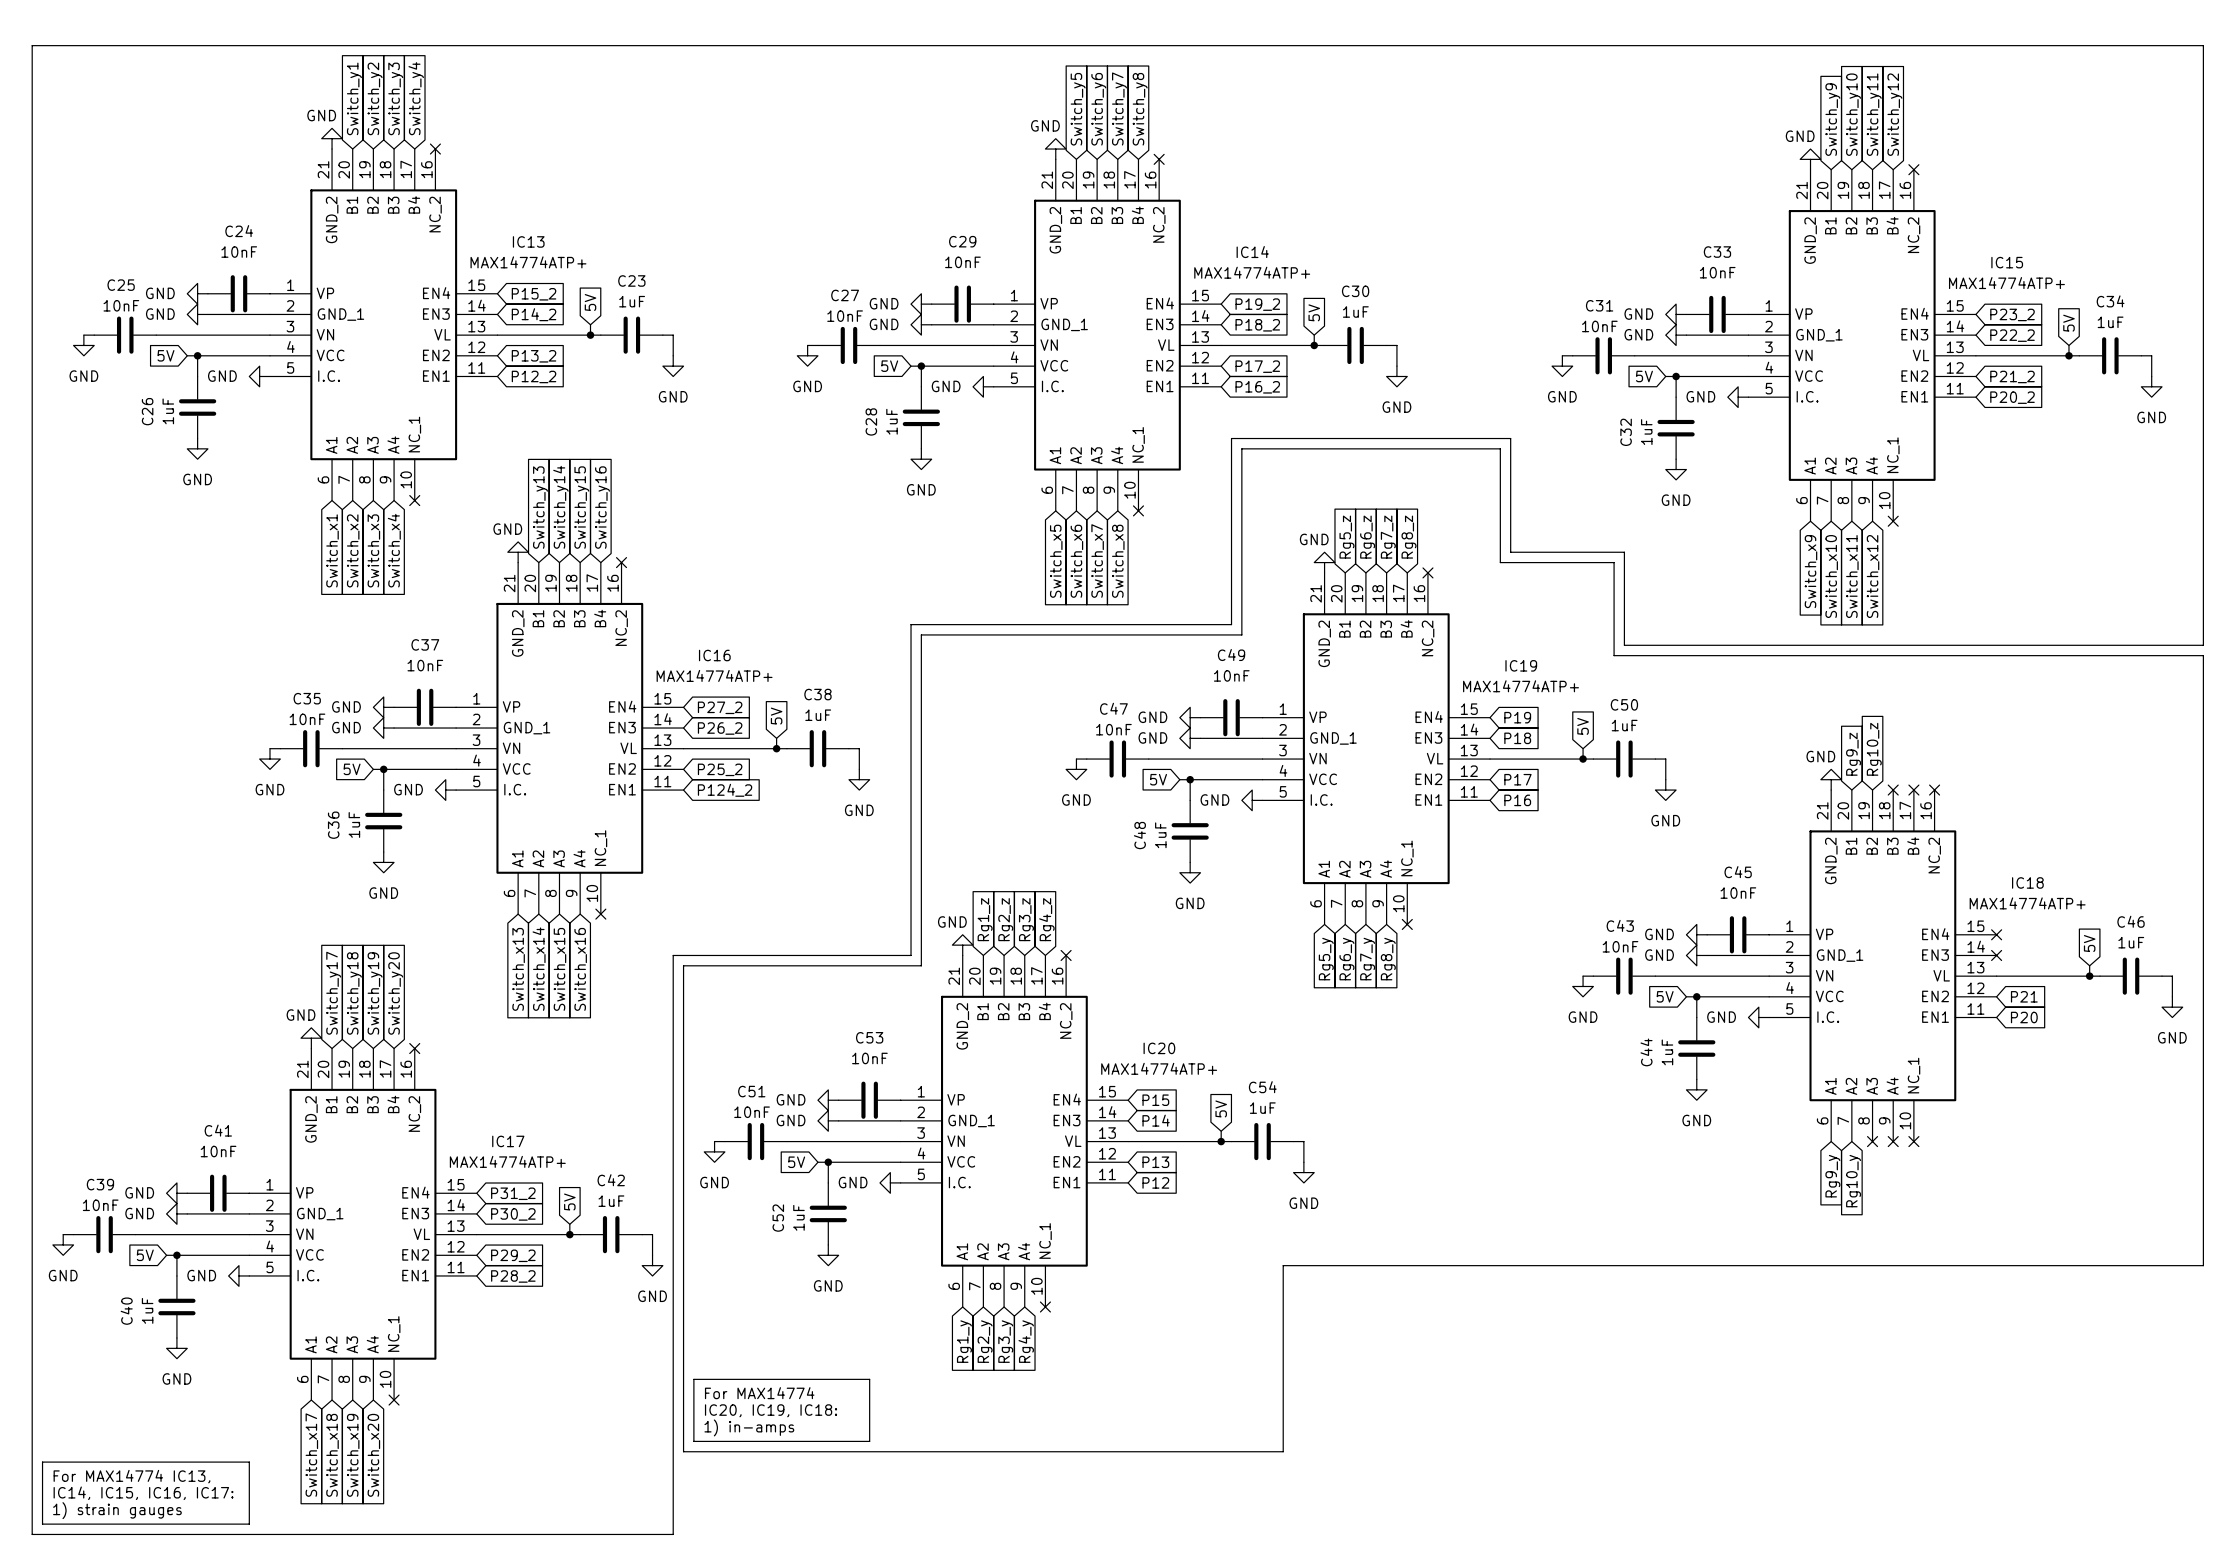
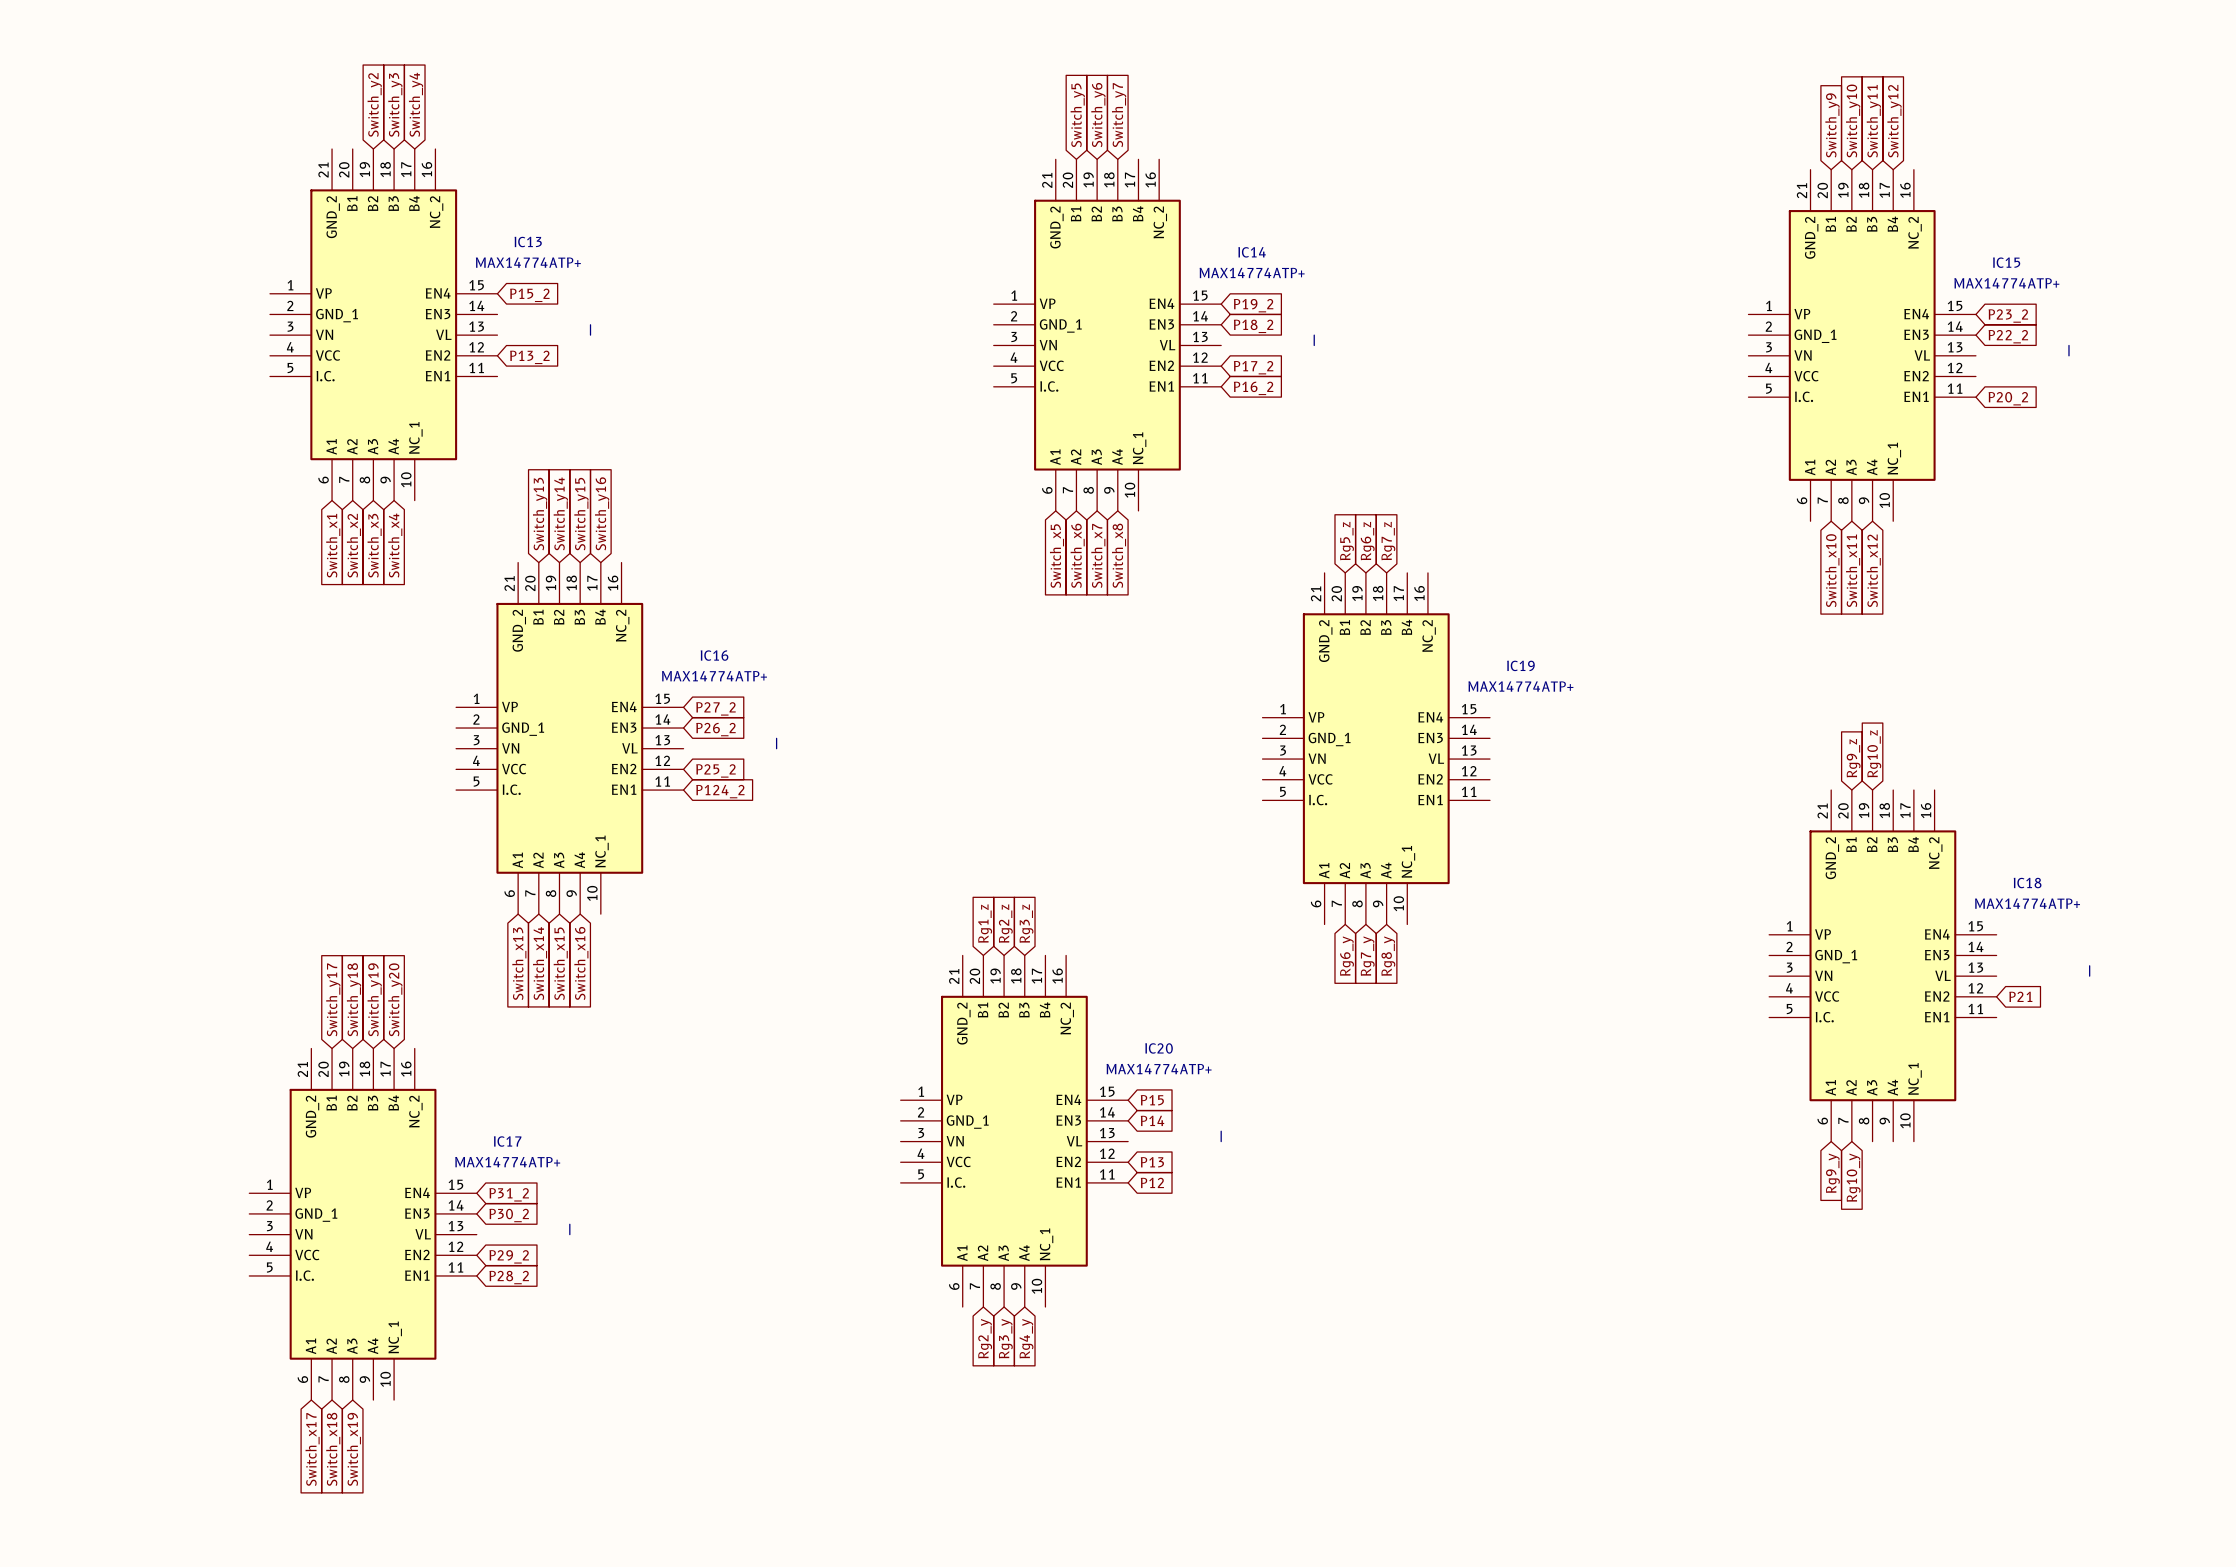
line: (32, 45) (2203, 45) (2203, 645) (1624, 645) (1624, 552) (1510, 552) (1510, 438) (1231, 438) (1231, 624) (911, 624) (911, 955) (673, 955) (673, 1534) (32, 1534) (32, 45) -> none
global label: Switch_y1 (354, 98) -> none
global label: Switch_y8 (1140, 109) -> none
power symbol: GND (332, 138) -> none
no-connect mark: (435, 149) -> none
power symbol: GND (1055, 149) -> none
no-connect mark: (1159, 159) -> none
power symbol: GND (1810, 159) -> none
no-connect mark: (1913, 169) -> none
power symbol: GND (197, 293) -> none
C24: 10nF (238, 293) -> none
global label: 5V (590, 302) -> none
power symbol: GND (921, 304) -> none
C29: 10nF (962, 304) -> none
global label: 5V (1314, 312) -> none
power symbol: GND (197, 314) -> none
wire: (207, 314) (269, 314) -> none
global label: P14_2 (534, 314) -> none
power symbol: GND (1676, 314) -> none
C33: 10nF (1717, 314) -> none
global label: 5V (2068, 323) -> none
power symbol: GND (921, 324) -> none
wire: (931, 324) (993, 324) -> none
wire: (83, 335) (94, 335) -> none
C25: 10nF (125, 335) -> none
wire: (156, 335) (269, 335) -> none
wire: (497, 335) (600, 335) -> none
junction: (590, 335) -> none
C23: 1uF (631, 335) -> none
wire: (662, 335) (673, 335) (673, 355) -> none
power symbol: GND (1676, 335) -> none
wire: (1686, 335) (1748, 335) -> none
power symbol: GND (83, 345) -> none
wire: (807, 345) (817, 345) -> none
C27: 10nF (848, 345) -> none
wire: (879, 345) (993, 345) -> none
wire: (1221, 345) (1324, 345) -> none
junction: (1314, 345) -> none
C30: 1uF (1355, 345) -> none
wire: (1386, 345) (1396, 345) (1396, 366) -> none
global label: 5V (165, 355) -> none
wire: (187, 355) (269, 355) -> none
wire: (197, 355) (197, 376) -> none
junction: (197, 355) -> none
power symbol: GND (807, 355) -> none
wire: (1562, 355) (1572, 355) -> none
C31: 10nF (1603, 355) -> none
wire: (1634, 355) (1748, 355) -> none
wire: (1975, 355) (2079, 355) -> none
junction: (2068, 355) -> none
C34: 1uF (2110, 355) -> none
wire: (2141, 355) (2151, 355) (2151, 376) -> none
power symbol: GND (673, 366) -> none
global label: 5V (889, 366) -> none
wire: (911, 366) (993, 366) -> none
wire: (921, 366) (921, 386) -> none
junction: (921, 366) -> none
power symbol: GND (1562, 366) -> none
power symbol: GND (259, 376) -> none
global label: P12_2 (534, 376) -> none
power symbol: GND (1396, 376) -> none
global label: 5V (1644, 376) -> none
wire: (1665, 376) (1748, 376) -> none
wire: (1676, 376) (1676, 397) -> none
junction: (1676, 376) -> none
global label: P21_2 (2012, 376) -> none
power symbol: GND (983, 386) -> none
power symbol: GND (2151, 386) -> none
power symbol: GND (1738, 397) -> none
C26: 1uF (197, 407) -> none
C28: 1uF (921, 417) -> none
C32: 1uF (1676, 428) -> none
power symbol: GND (197, 448) -> none
line: (1241, 448) (1241, 634) (921, 634) (921, 965) (683, 965) (683, 1451) (1283, 1451) (1283, 1265) (2203, 1265) (2203, 655) (1614, 655) (1614, 562) (1500, 562) (1500, 448) (1241, 448) -> none
power symbol: GND (921, 459) -> none
power symbol: GND (1676, 469) -> none
no-connect mark: (414, 500) -> none
no-connect mark: (1138, 510) -> none
no-connect mark: (1893, 521) -> none
global label: Rg8_z (1409, 537) -> none
power symbol: GND (518, 552) -> none
no-connect mark: (621, 562) -> none
power symbol: GND (1324, 562) -> none
global label: Switch_x9 (1811, 571) -> none
no-connect mark: (1427, 572) -> none
power symbol: GND (383, 707) -> none
C37: 10nF (425, 707) -> none
global label: 5V (776, 716) -> none
power symbol: GND (1190, 717) -> none
C49: 10nF (1231, 717) -> none
global label: P19 (1517, 717) -> none
global label: 5V (1583, 726) -> none
power symbol: GND (383, 728) -> none
wire: (394, 728) (456, 728) -> none
power symbol: GND (1190, 738) -> none
wire: (1200, 738) (1262, 738) -> none
global label: P18 (1517, 738) -> none
wire: (269, 748) (280, 748) -> none
C35: 10nF (311, 748) -> none
wire: (342, 748) (456, 748) -> none
wire: (683, 748) (786, 748) -> none
junction: (776, 748) -> none
C38: 1uF (817, 748) -> none
wire: (848, 748) (859, 748) (859, 769) -> none
wire: (1583, 748) (1583, 759) -> none
power symbol: GND (269, 759) -> none
wire: (1076, 759) (1086, 759) -> none
C47: 10nF (1117, 759) -> none
wire: (1148, 759) (1262, 759) -> none
wire: (1490, 759) (1593, 759) -> none
junction: (1583, 759) -> none
C50: 1uF (1624, 759) -> none
wire: (1655, 759) (1665, 759) (1665, 779) -> none
global label: 5V (352, 769) -> none
wire: (373, 769) (456, 769) -> none
wire: (383, 769) (383, 790) -> none
junction: (383, 769) -> none
power symbol: GND (1076, 769) -> none
power symbol: GND (859, 779) -> none
global label: 5V (1158, 779) -> none
wire: (1179, 779) (1262, 779) -> none
wire: (1190, 779) (1190, 800) -> none
junction: (1190, 779) -> none
global label: P17 (1517, 779) -> none
power symbol: GND (1831, 779) -> none
power symbol: GND (445, 790) -> none
power symbol: GND (1665, 790) -> none
no-connect mark: (1893, 790) -> none
no-connect mark: (1913, 790) -> none
no-connect mark: (1934, 790) -> none
power symbol: GND (1252, 800) -> none
global label: P16 (1517, 800) -> none
C36: 1uF (383, 821) -> none
C48: 1uF (1190, 831) -> none
power symbol: GND (383, 862) -> none
power symbol: GND (1190, 872) -> none
no-connect mark: (600, 914) -> none
global label: Rg4_z (1046, 919) -> none
no-connect mark: (1407, 924) -> none
power symbol: GND (1696, 934) -> none
C45: 10nF (1738, 934) -> none
no-connect mark: (1996, 934) -> none
global label: 5V (2089, 943) -> none
power symbol: GND (962, 945) -> none
no-connect mark: (1066, 955) -> none
power symbol: GND (1696, 955) -> none
wire: (1707, 955) (1769, 955) -> none
no-connect mark: (1996, 955) -> none
global label: Rg5_y (1326, 959) -> none
wire: (1583, 976) (1593, 976) -> none
C43: 10nF (1624, 976) -> none
wire: (1655, 976) (1769, 976) -> none
wire: (1996, 976) (2100, 976) -> none
junction: (2089, 976) -> none
C46: 1uF (2131, 976) -> none
wire: (2162, 976) (2172, 976) (2172, 996) -> none
power symbol: GND (1583, 986) -> none
global label: 5V (1665, 996) -> none
wire: (1686, 996) (1769, 996) -> none
wire: (1696, 996) (1696, 1017) -> none
junction: (1696, 996) -> none
power symbol: GND (2172, 1007) -> none
power symbol: GND (1758, 1017) -> none
global label: P20 (2024, 1017) -> none
power symbol: GND (311, 1038) -> none
no-connect mark: (414, 1048) -> none
C44: 1uF (1696, 1048) -> none
power symbol: GND (1696, 1089) -> none
power symbol: GND (828, 1100) -> none
C53: 10nF (869, 1100) -> none
global label: 5V (1221, 1108) -> none
power symbol: GND (828, 1120) -> none
wire: (838, 1120) (900, 1120) -> none
wire: (714, 1141) (724, 1141) -> none
C51: 10nF (755, 1141) -> none
wire: (786, 1141) (900, 1141) -> none
wire: (1128, 1141) (1231, 1141) -> none
junction: (1221, 1141) -> none
C54: 1uF (1262, 1141) -> none
wire: (1293, 1141) (1303, 1141) (1303, 1162) -> none
no-connect mark: (1872, 1141) -> none
no-connect mark: (1893, 1141) -> none
no-connect mark: (1913, 1141) -> none
power symbol: GND (714, 1151) -> none
global label: 5V (796, 1162) -> none
wire: (817, 1162) (900, 1162) -> none
wire: (828, 1162) (828, 1182) -> none
junction: (828, 1162) -> none
power symbol: GND (1303, 1172) -> none
power symbol: GND (890, 1182) -> none
power symbol: GND (176, 1193) -> none
C41: 10nF (218, 1193) -> none
global label: 5V (569, 1201) -> none
power symbol: GND (176, 1213) -> none
wire: (187, 1213) (249, 1213) -> none
C52: 1uF (828, 1213) -> none
wire: (63, 1234) (73, 1234) -> none
C39: 10nF (104, 1234) -> none
wire: (135, 1234) (249, 1234) -> none
wire: (476, 1234) (580, 1234) -> none
junction: (569, 1234) -> none
C42: 1uF (611, 1234) -> none
wire: (642, 1234) (652, 1234) (652, 1255) -> none
power symbol: GND (63, 1244) -> none
global label: 5V (145, 1255) -> none
wire: (166, 1255) (249, 1255) -> none
wire: (176, 1255) (176, 1275) -> none
junction: (176, 1255) -> none
power symbol: GND (828, 1255) -> none
power symbol: GND (652, 1265) -> none
power symbol: GND (238, 1275) -> none
C40: 1uF (176, 1307) -> none
no-connect mark: (1045, 1307) -> none
global label: Rg1_y (964, 1341) -> none
power symbol: GND (176, 1348) -> none
line: (693, 1379) (869, 1379) (869, 1441) (693, 1441) (693, 1379) -> none
text: For MAX14774 (759, 1393) -> none
no-connect mark: (394, 1400) -> none
text: IC20, IC19, IC18: (771, 1410) -> none
text: 1) in-amps (749, 1427) -> none
global label: Switch_x20 (373, 1455) -> none
line: (42, 1462) (249, 1462) (249, 1524) (42, 1524) (42, 1462) -> none
text: For MAX14774 IC13, (131, 1476) -> none
text: IC14, IC15, IC16, IC17: (143, 1493) -> none
text: 1) strain gauges (117, 1510) -> none

